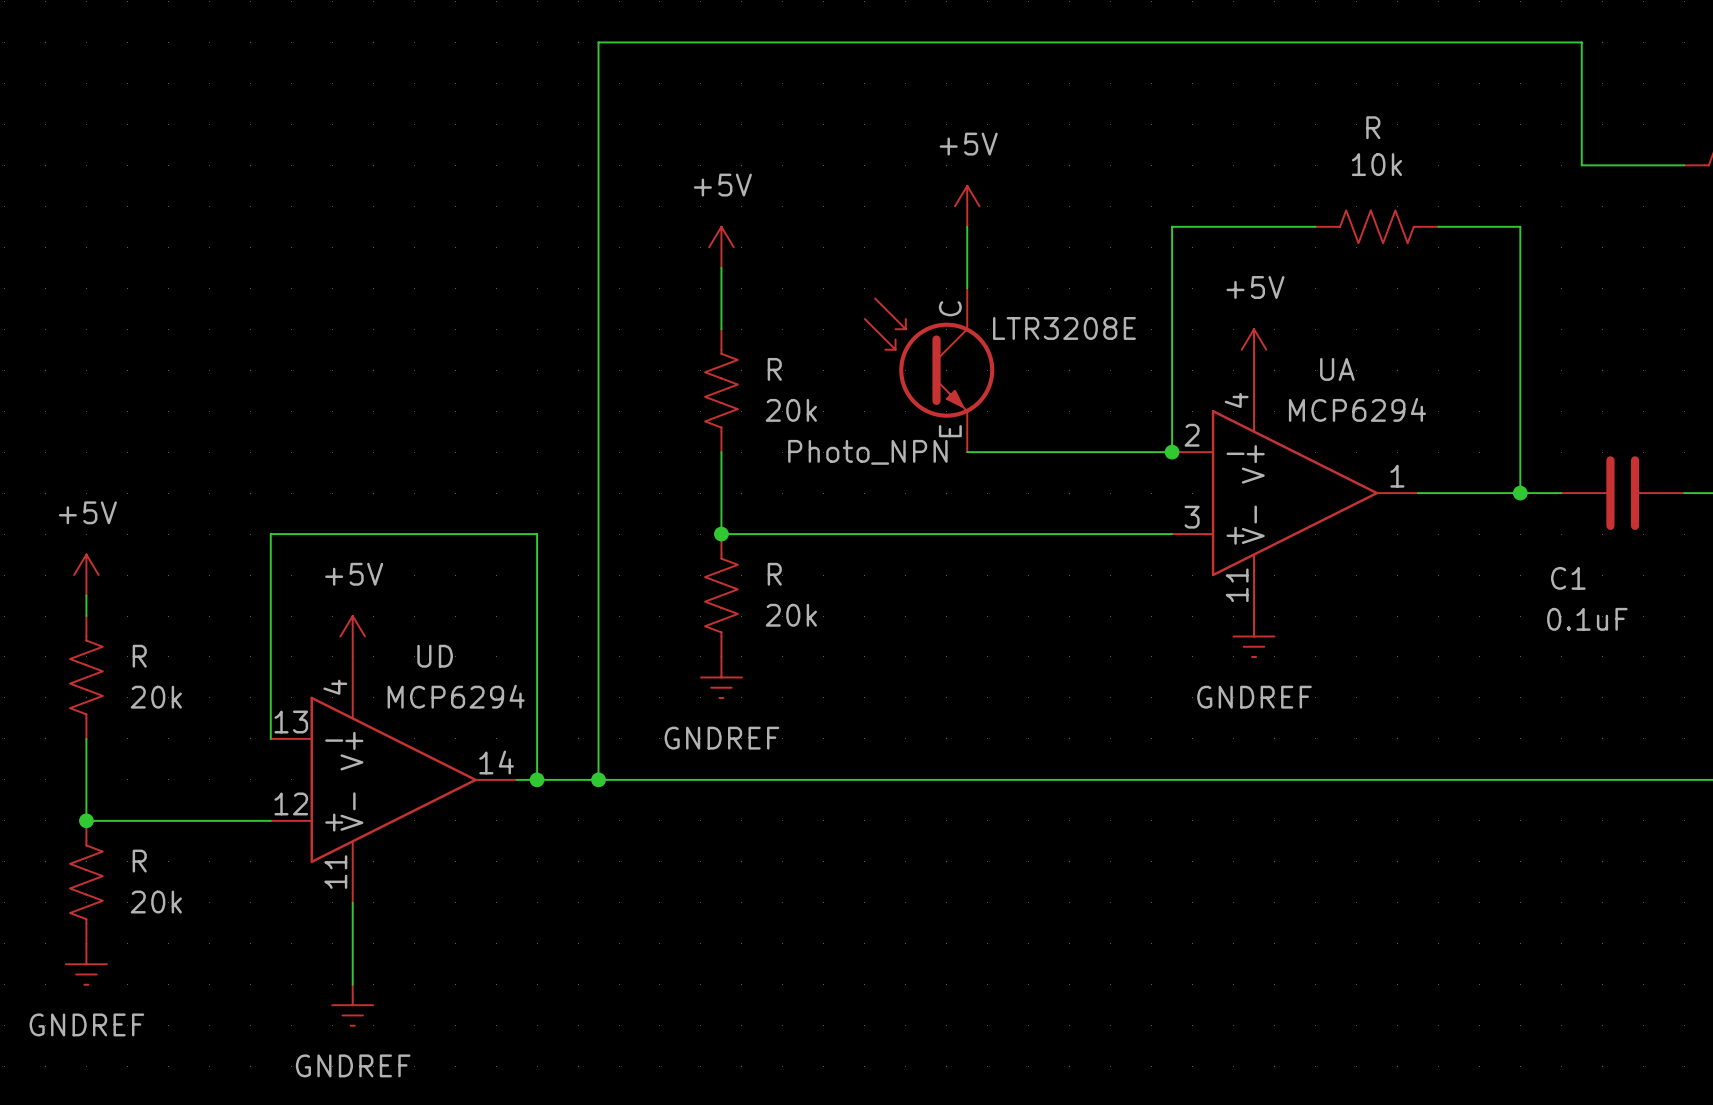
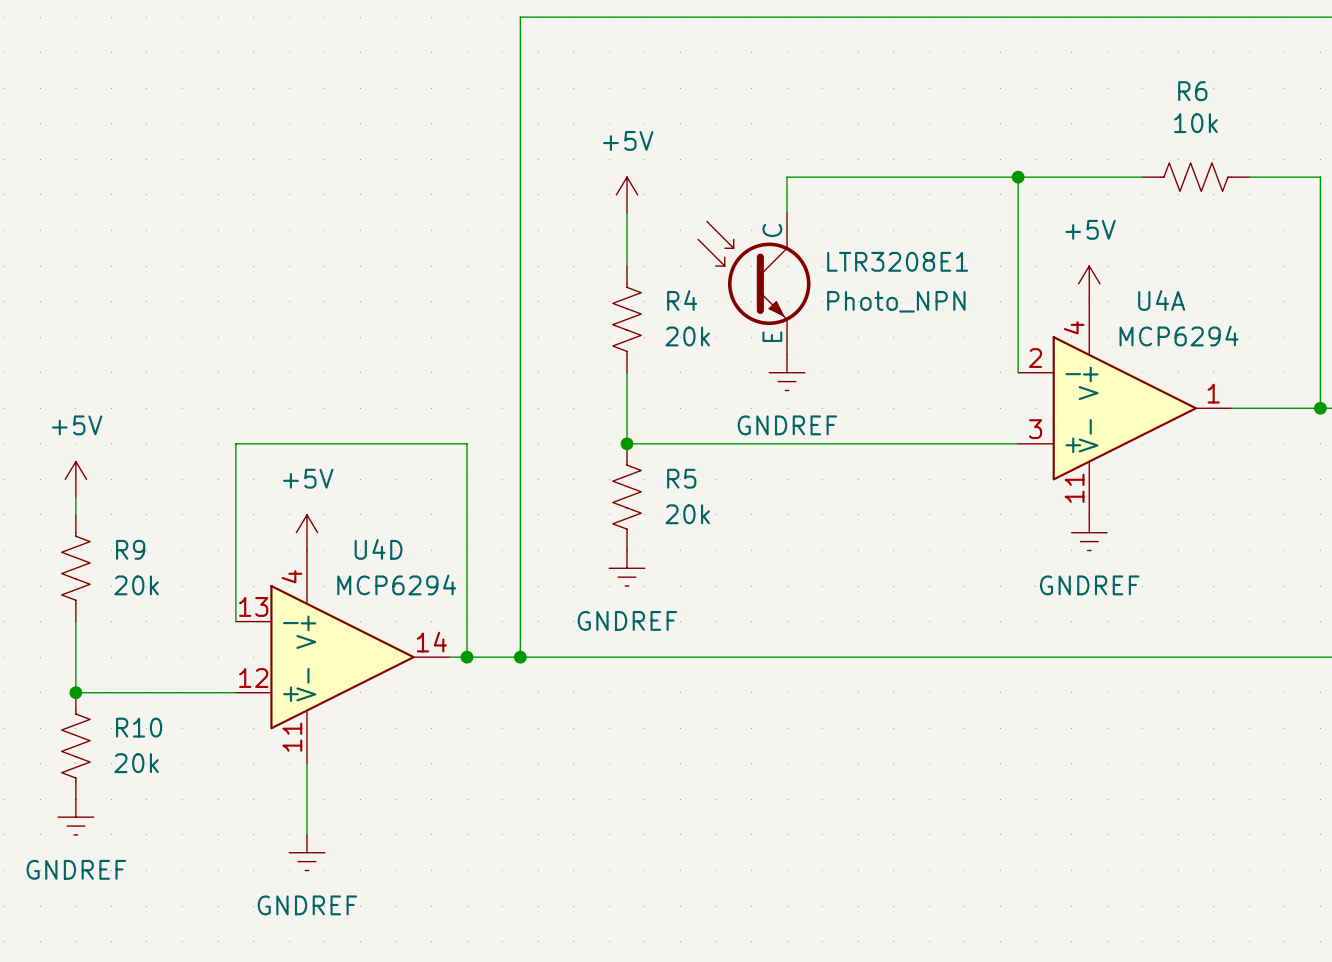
R name: R (1373, 127) -> R6 (1192, 91)
power symbol: +5V (967, 206) -> none
wire: (967, 226) (967, 288) -> none
wire: none -> (1018, 177) (787, 177) (787, 212)
junction: none -> (1018, 177)
LTR3208E1: none -> Photo_NPN (754, 283)
R name: R (774, 369) -> R4 (682, 300)
UA name: UA (1337, 369) -> U4A (1161, 300)
LTR3208E: Photo_NPN (929, 370) -> none
power symbol: none -> GNDREF (787, 372)
wire: (967, 452) (1172, 452) -> none
junction: (1172, 452) -> none
R name: R (774, 574) -> R5 (681, 478)
R name: R (139, 656) -> R9 (130, 549)
UD name: UD (435, 656) -> U4D (378, 549)
R name: R (139, 861) -> R10 (139, 727)

